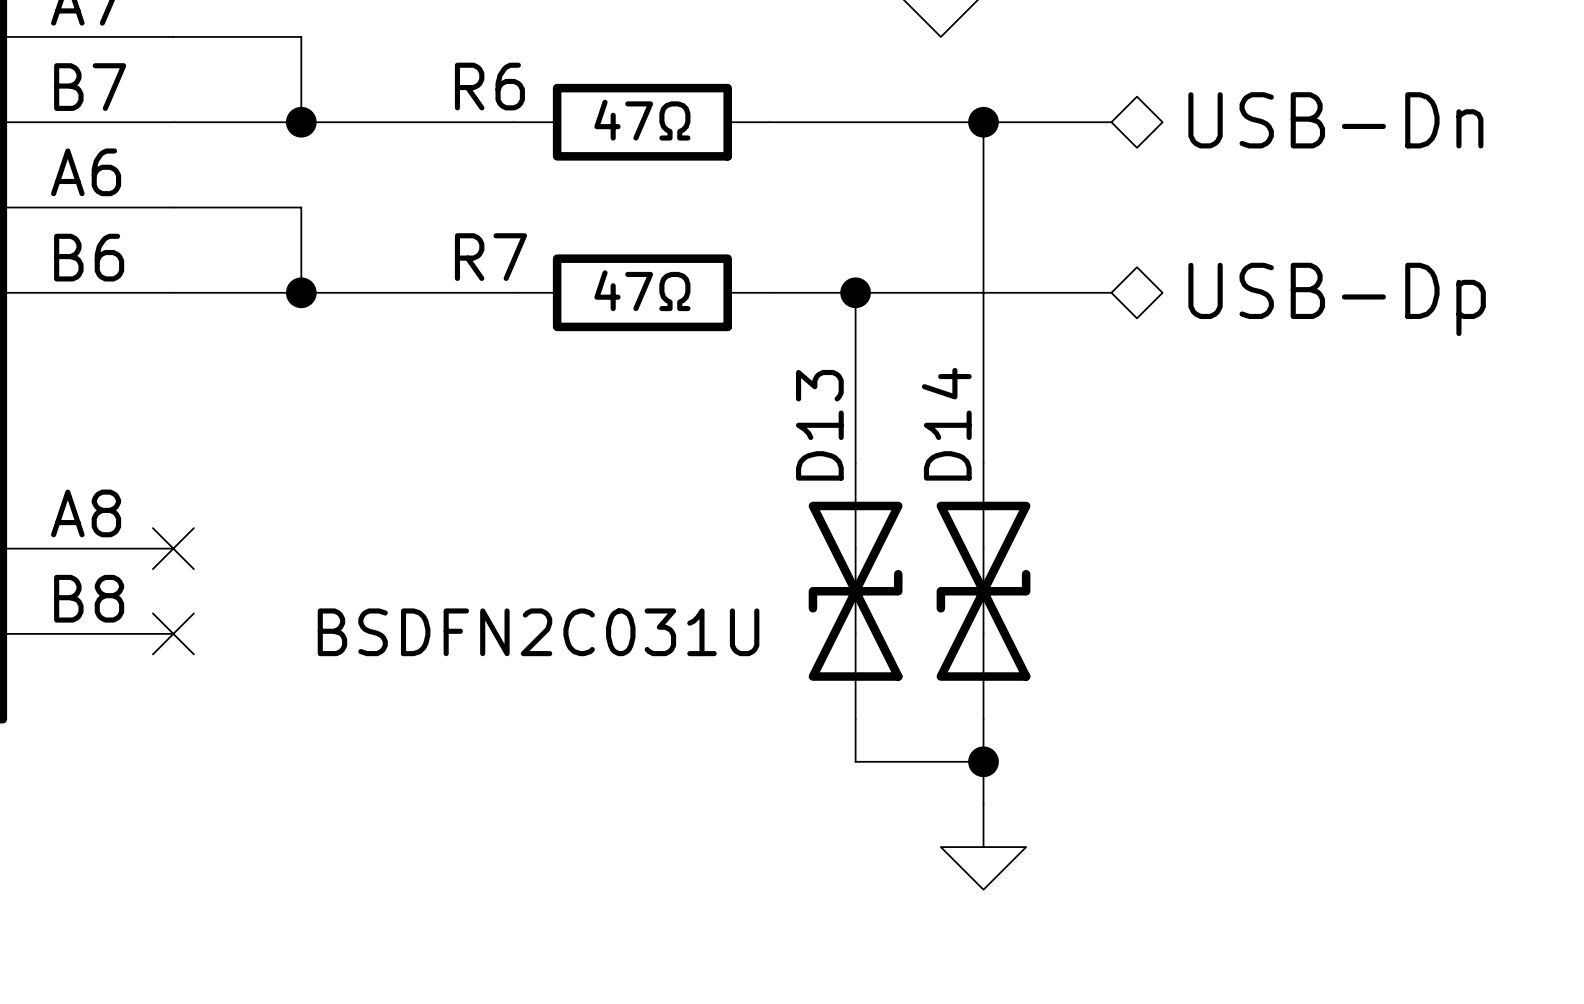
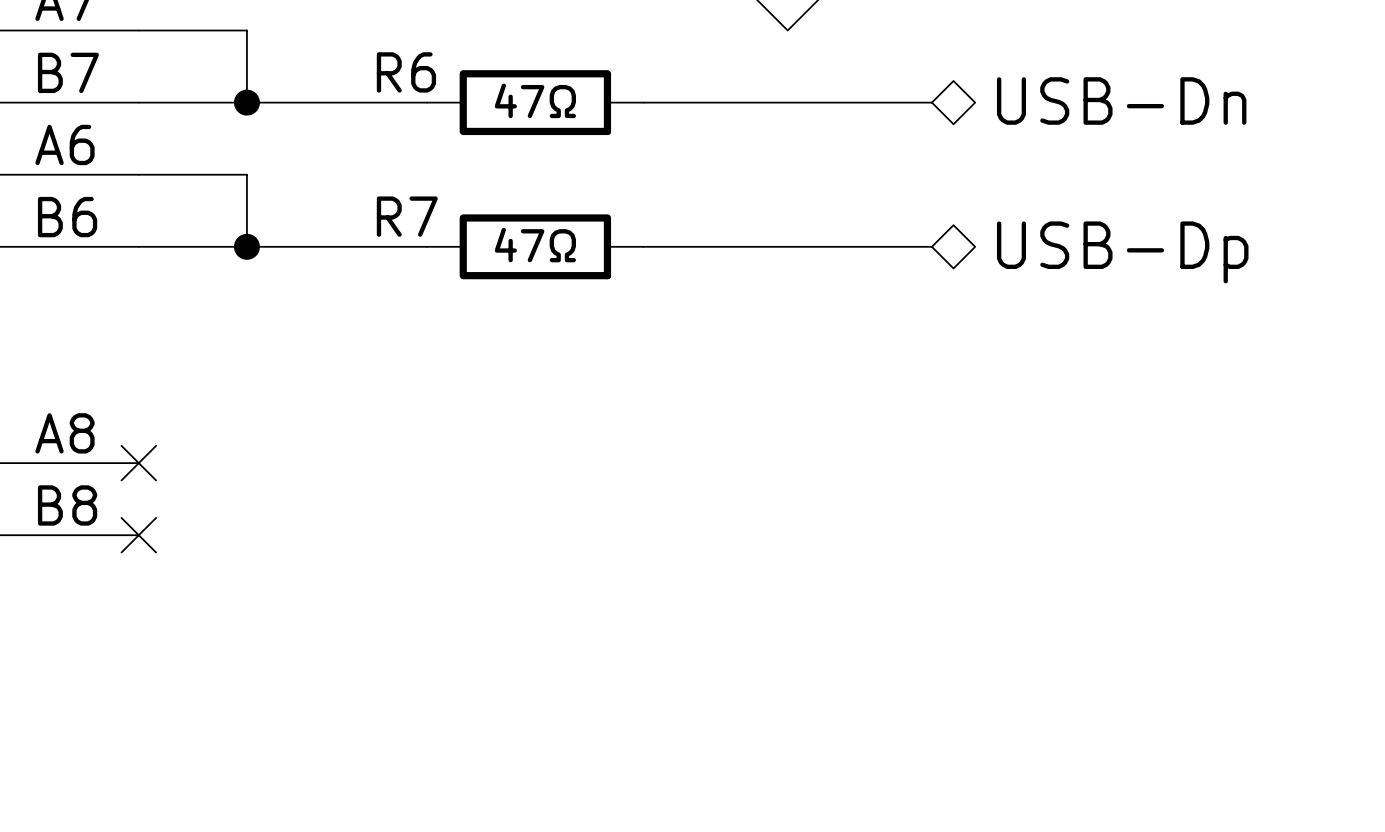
wire: (983, 122) (983, 463) -> none
junction: (983, 122) -> none
wire: (855, 292) (855, 463) -> none
junction: (855, 292) -> none
D13: BSDFN2C031U (855, 591) -> none
D14: (983, 591) -> none
wire: (855, 719) (855, 761) (983, 761) -> none
wire: (983, 719) (983, 804) -> none
junction: (983, 761) -> none
power symbol: (983, 847) -> none

